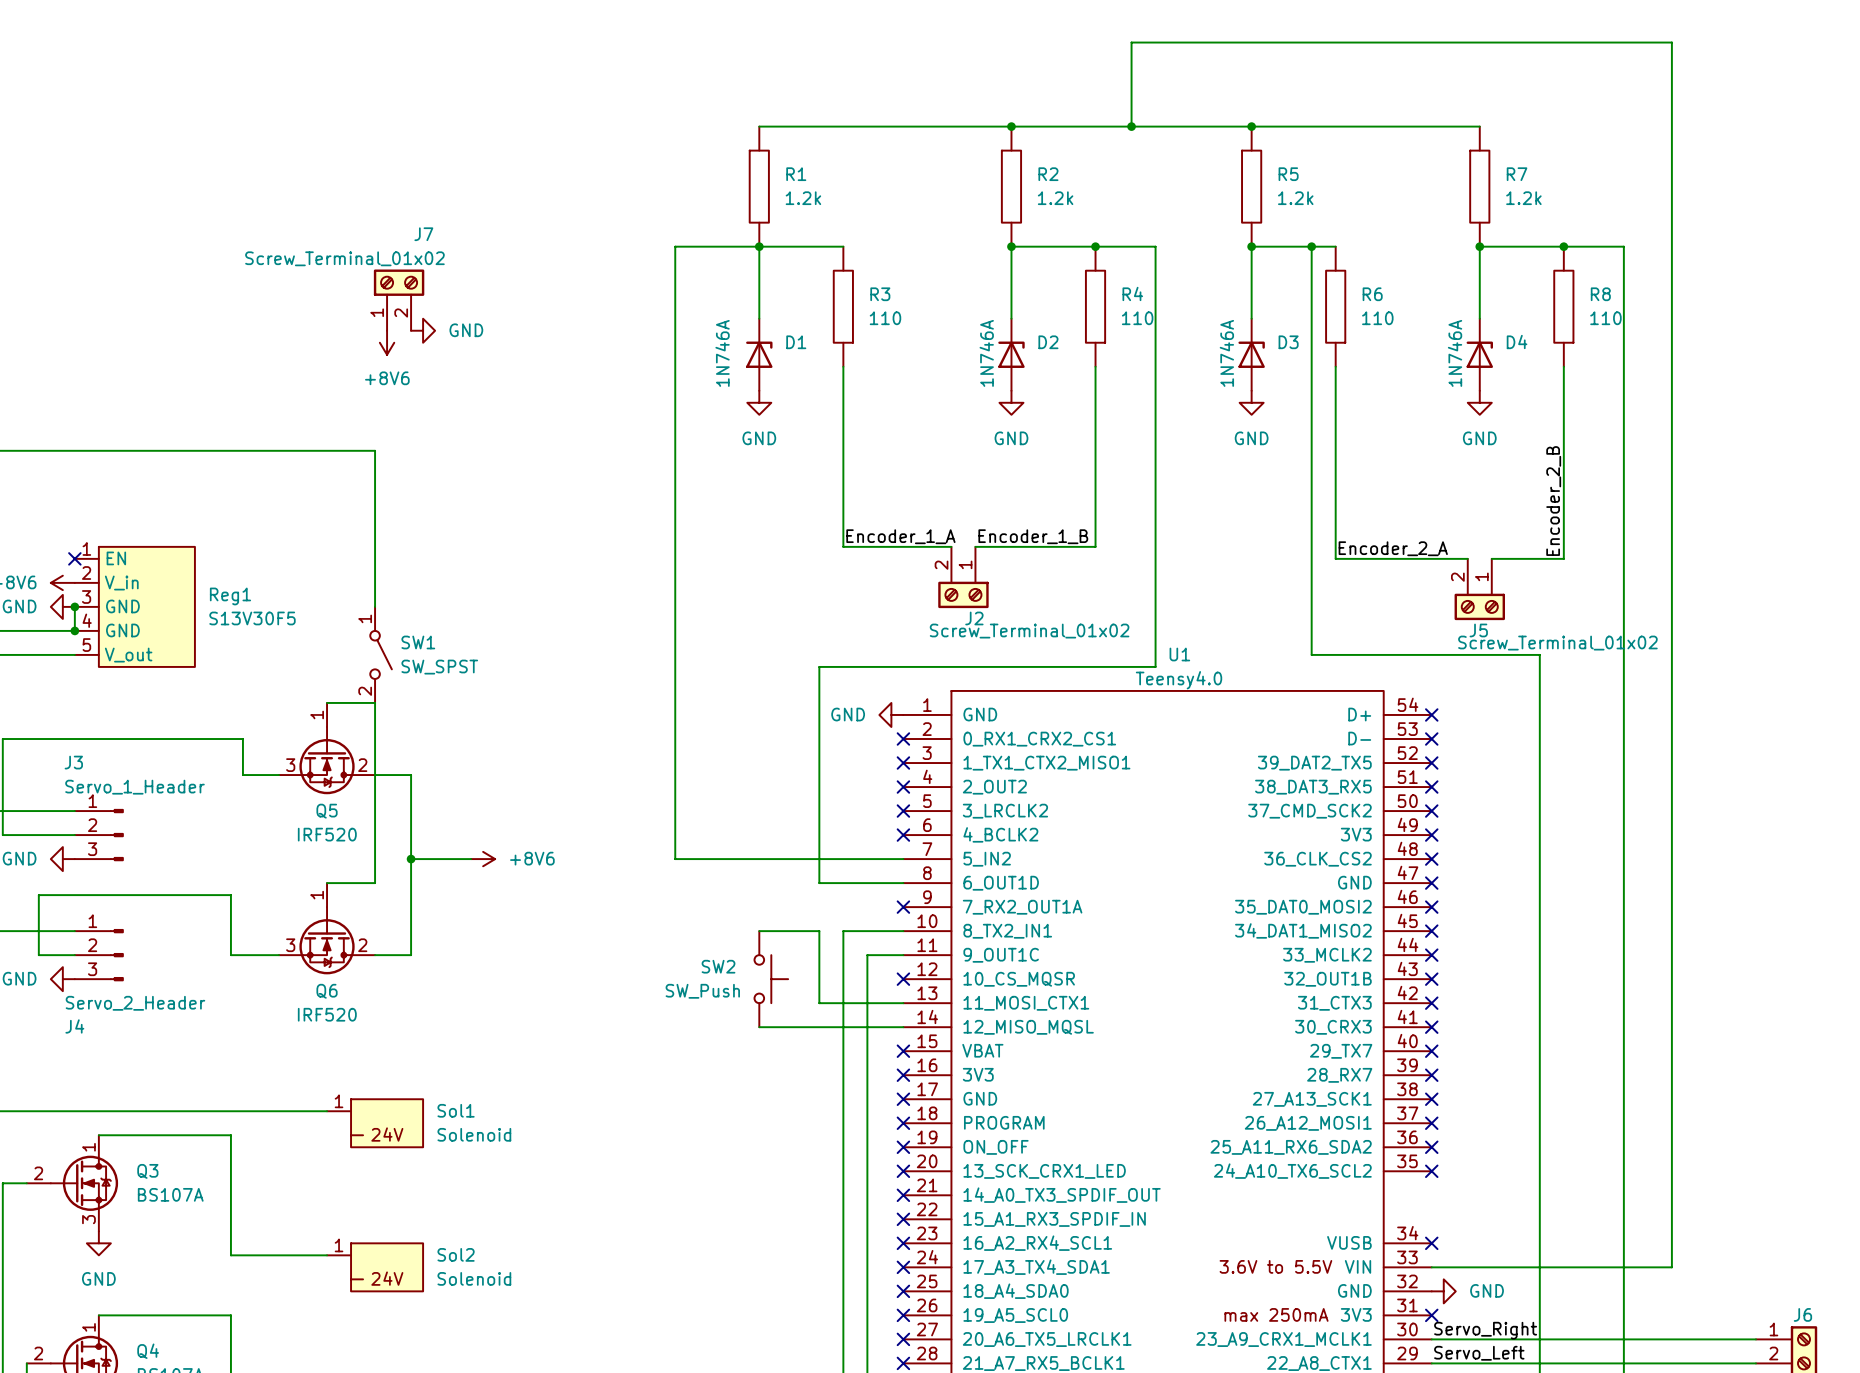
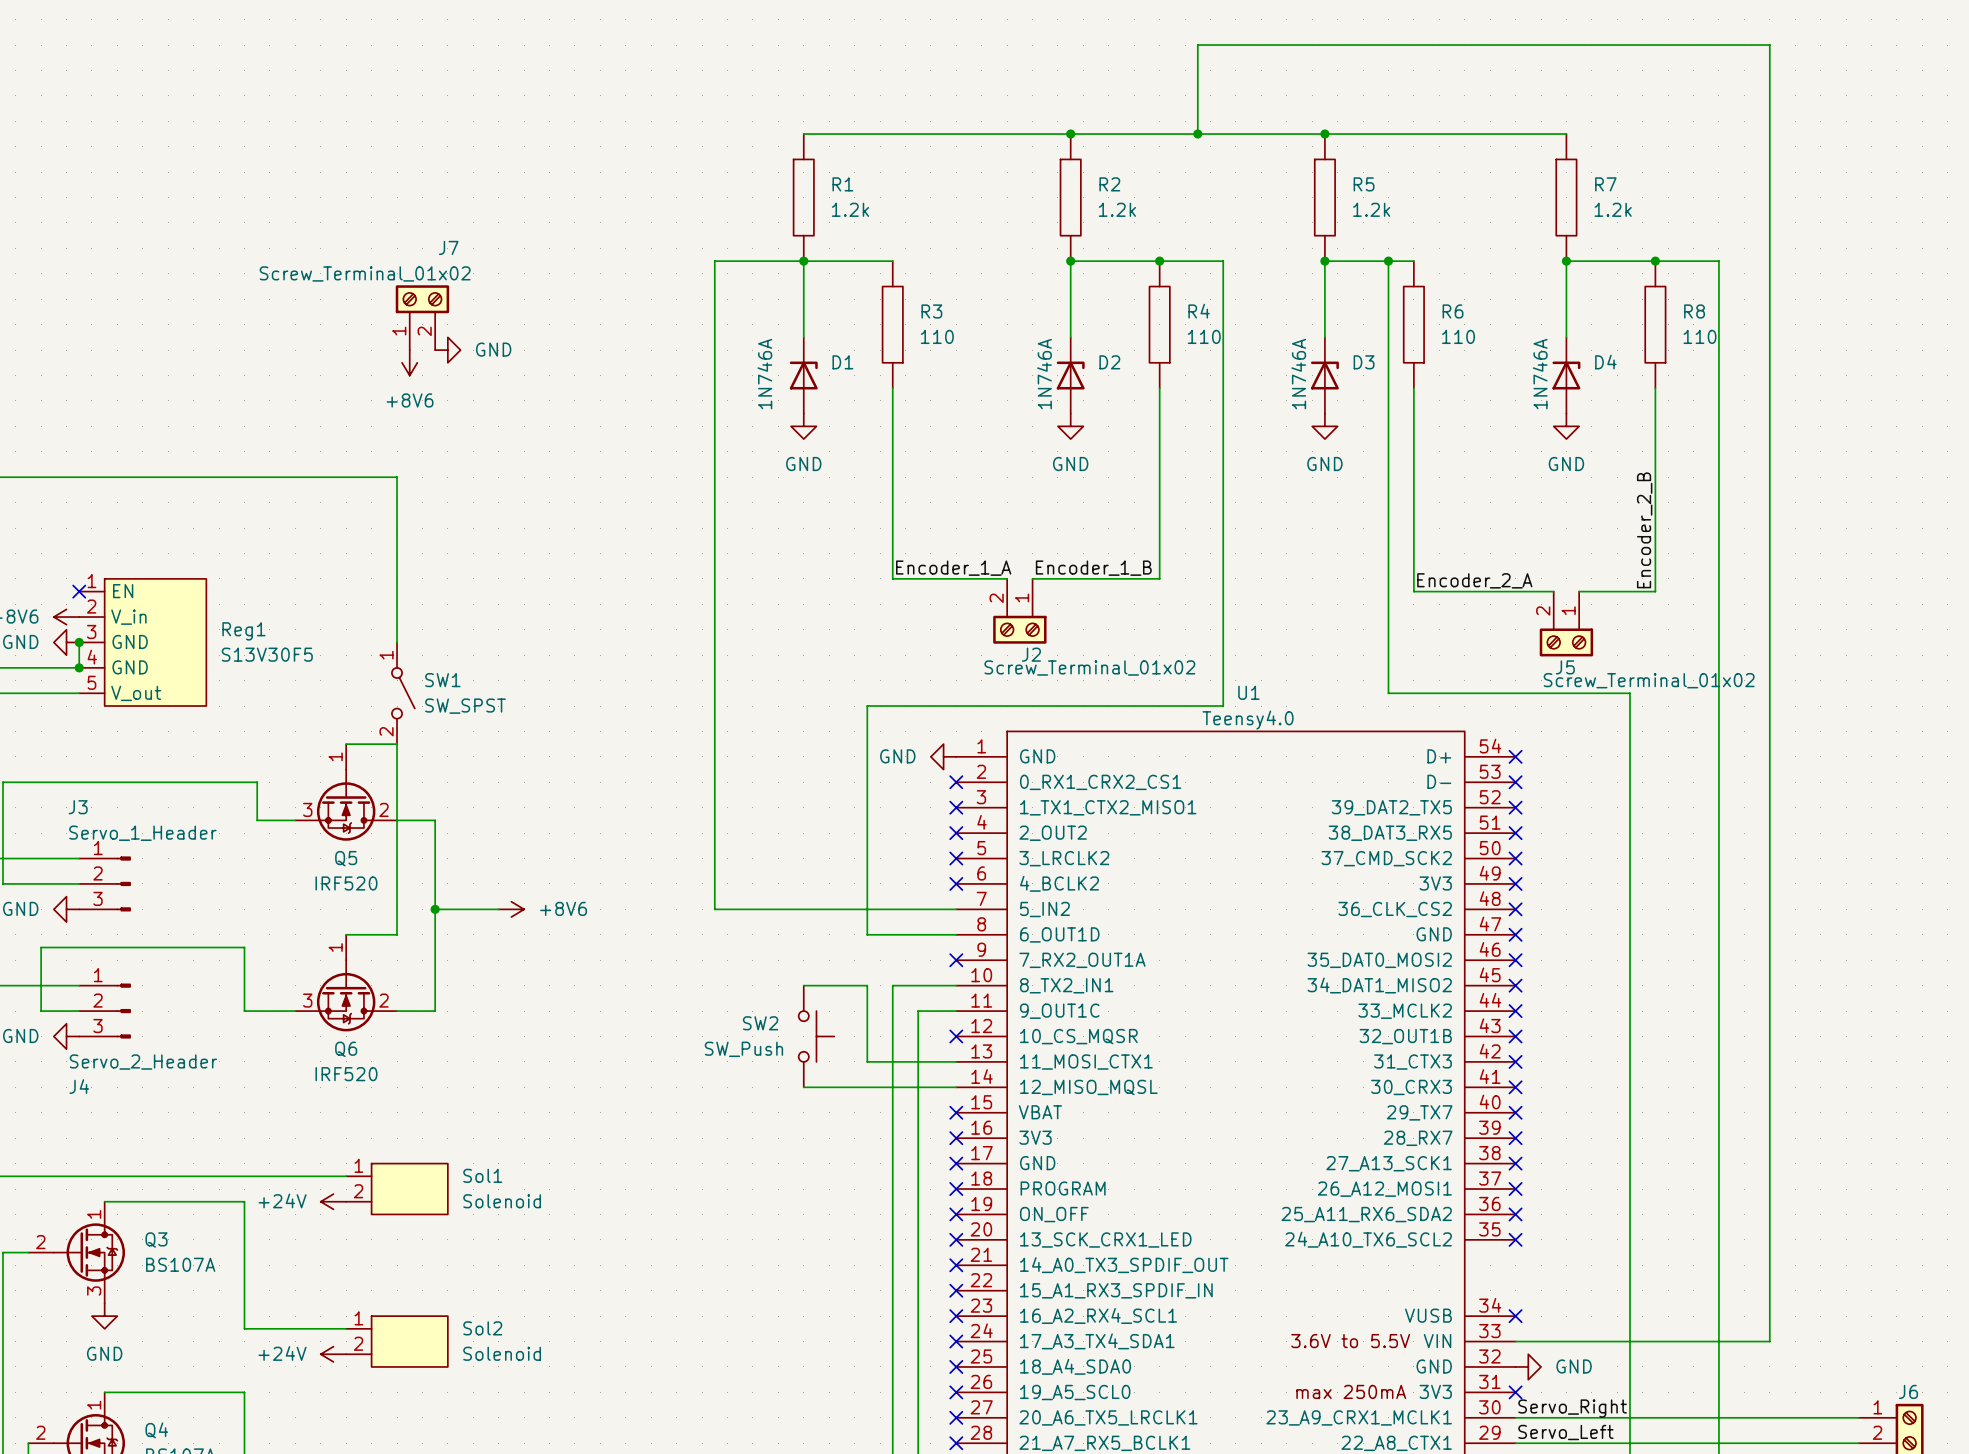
Sol1 symbol: [327, 1099, 424, 1148] -> [346, 1163, 448, 1215]
power symbol: none -> +24V (333, 1201)
Sol2 symbol: [327, 1243, 424, 1292] -> [346, 1316, 448, 1367]
power symbol: none -> +24V (333, 1354)

